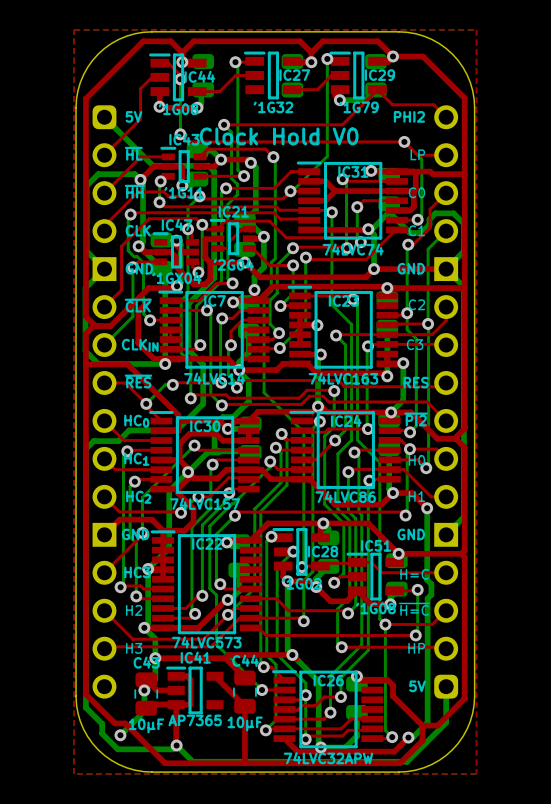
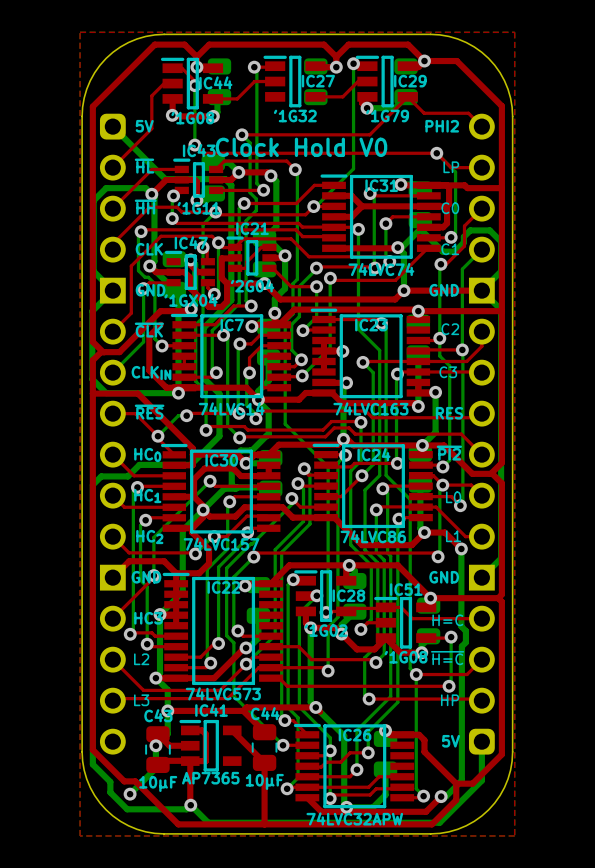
text: H0 (416, 460) -> L0 (453, 497)
text: H1 (416, 496) -> L1 (453, 536)
text: H2 (134, 610) -> L2 (141, 659)
text: H3 (134, 648) -> L3 (141, 700)

